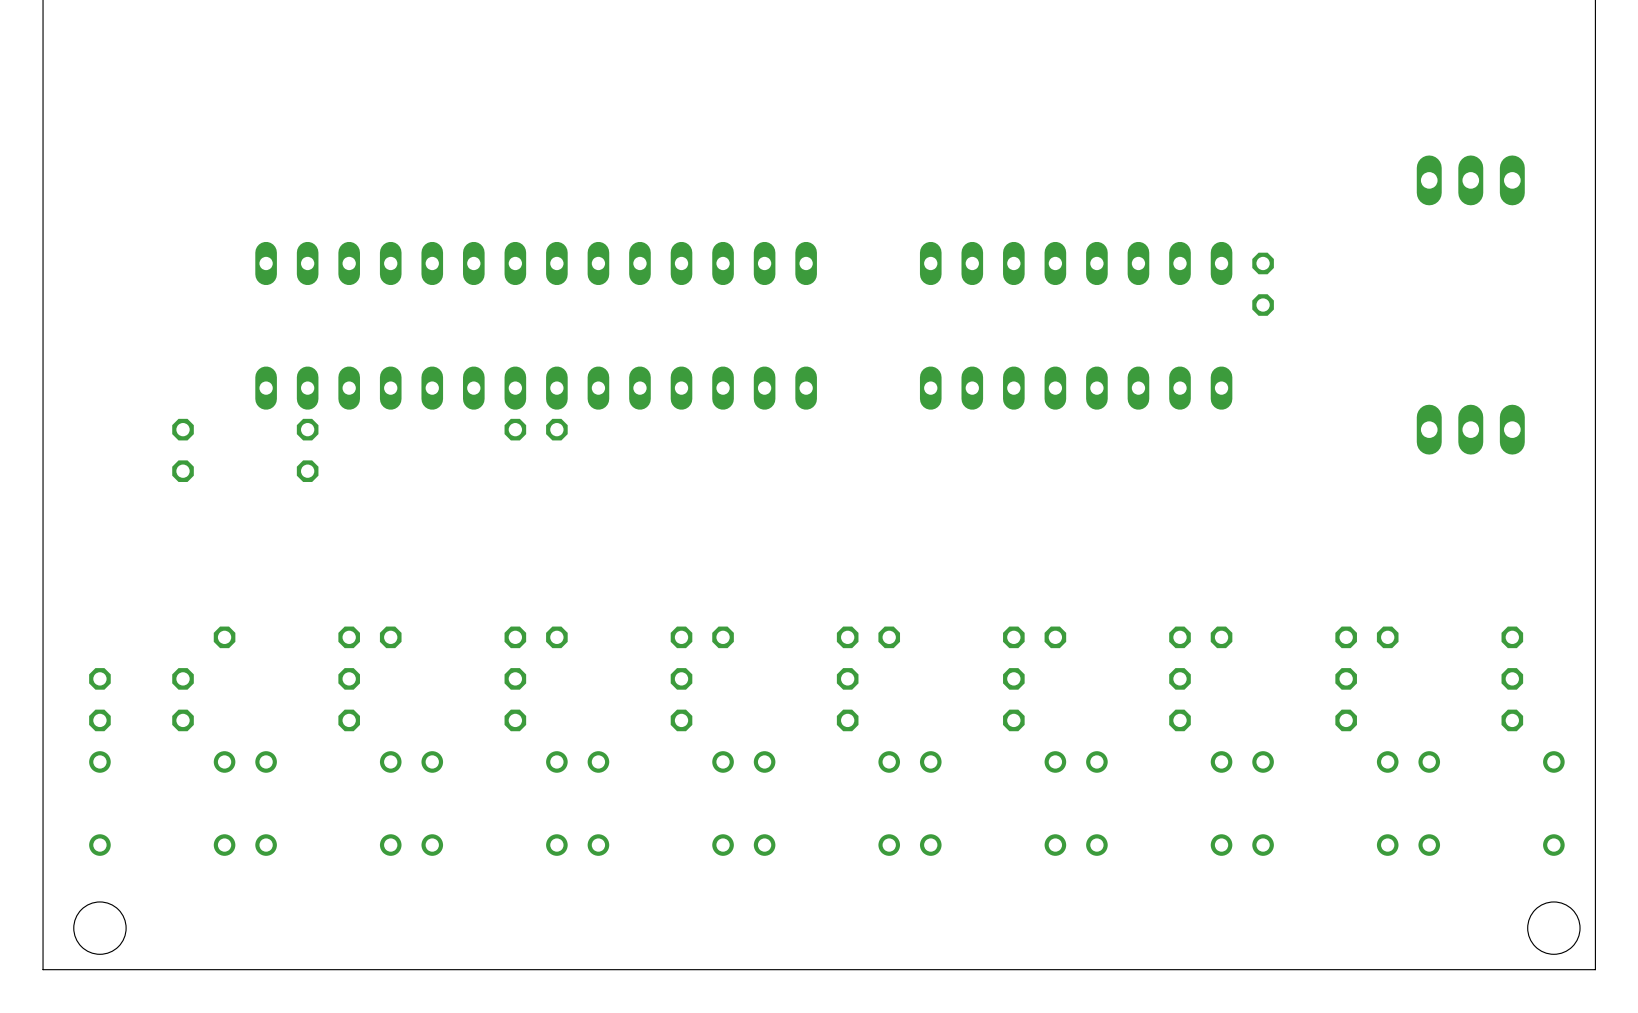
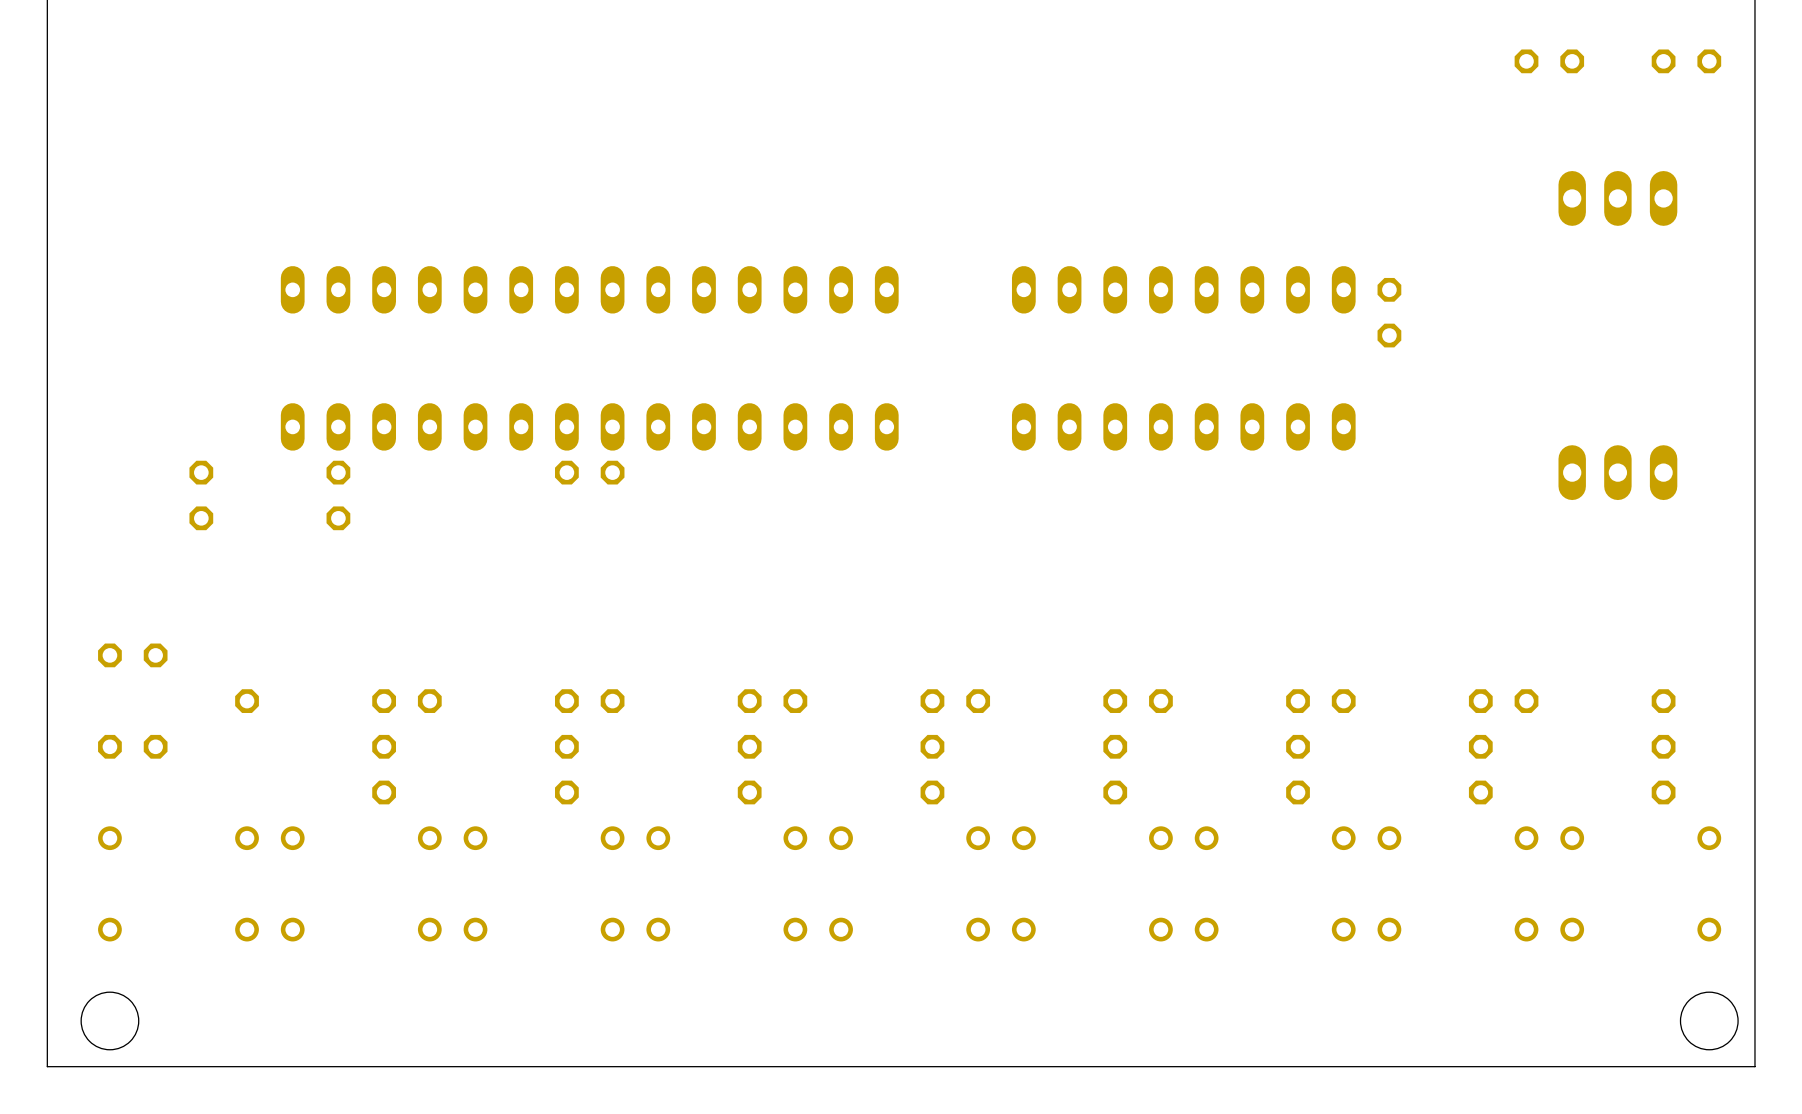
part: none -> (1549, 61)
part: none -> (1686, 61)
part: none -> (132, 655)
part rotation: 0° (99, 699) -> 90° clockwise (132, 746)
part: (183, 699) -> none

